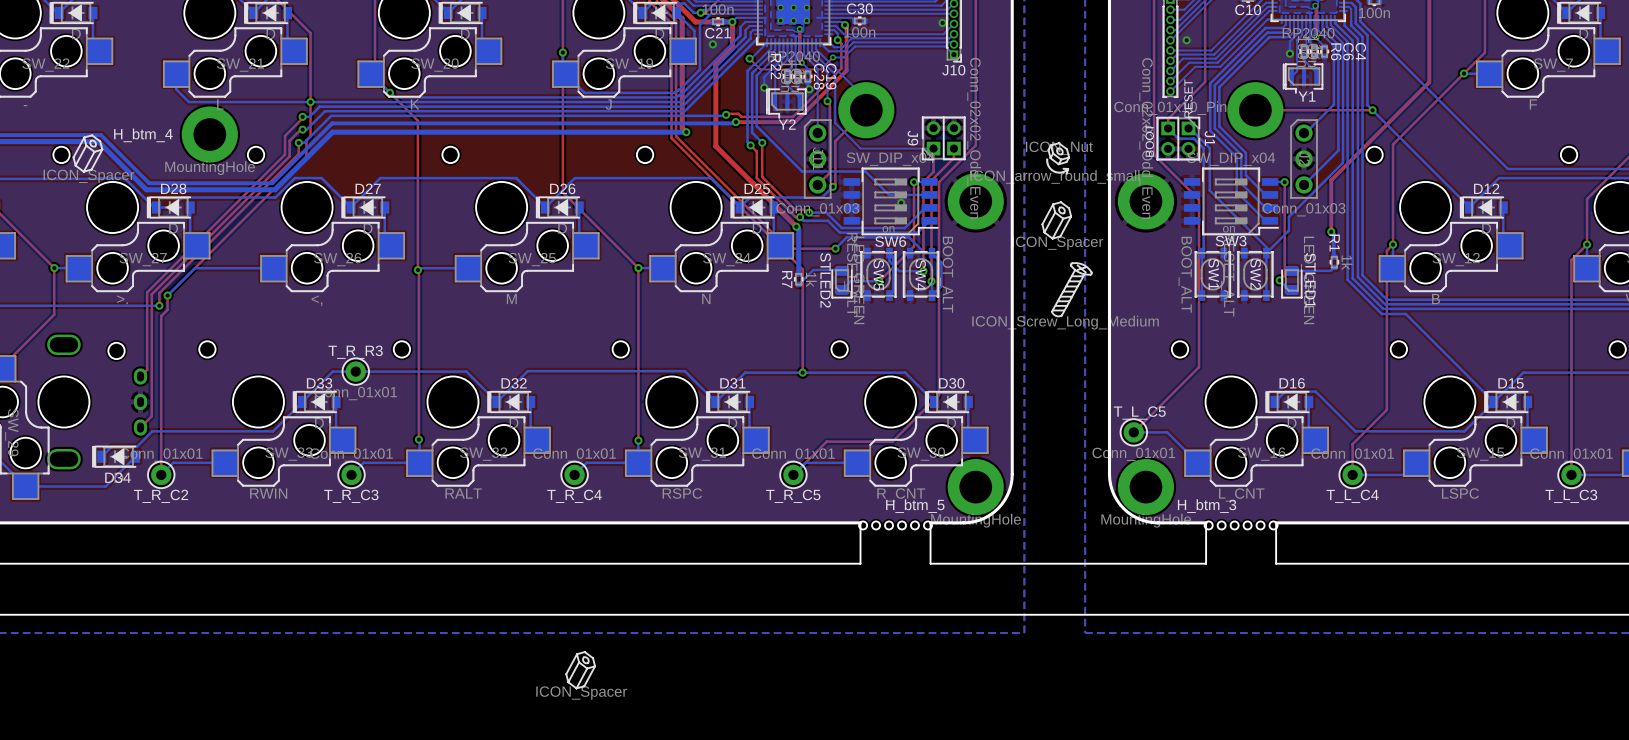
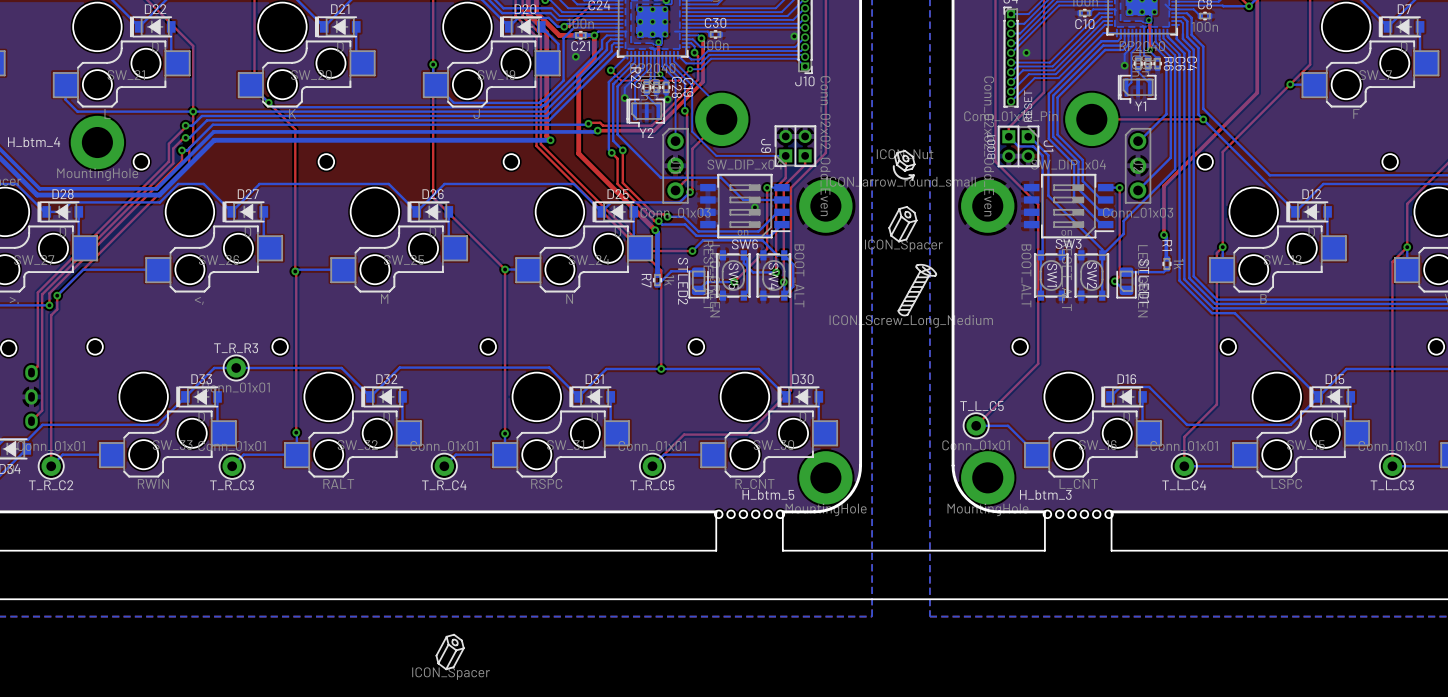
bottom track: (1372, 33) (1507, 169) -> (1203, 46) (1203, 108) (1269, 175) (1331, 175)

